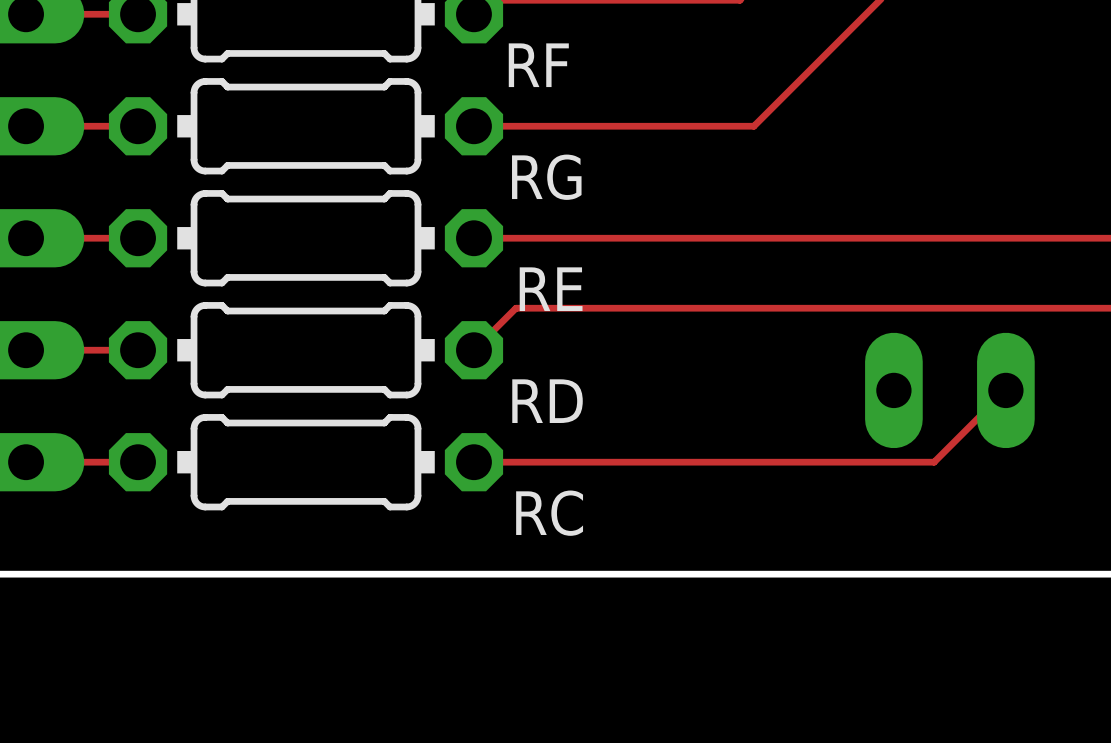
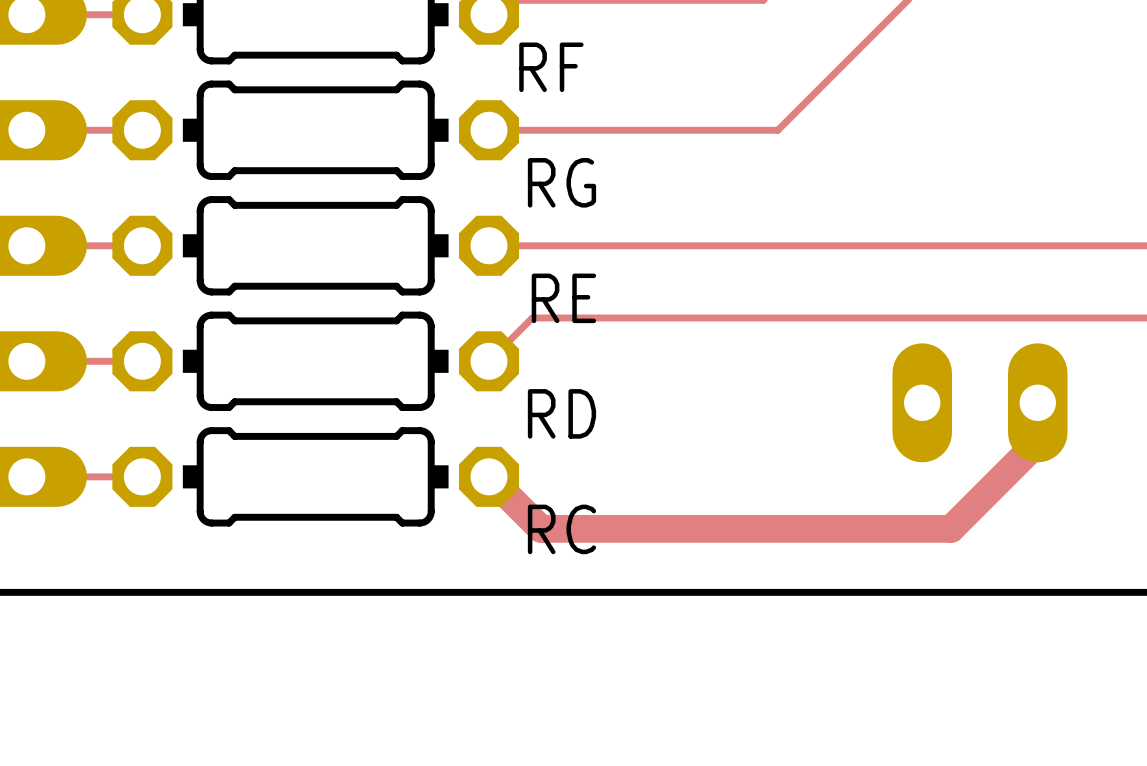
track: (1005, 390) (934, 462) (473, 462) (477, 464) -> (1037, 402) (1037, 442) (951, 528) (540, 528) (488, 476)

